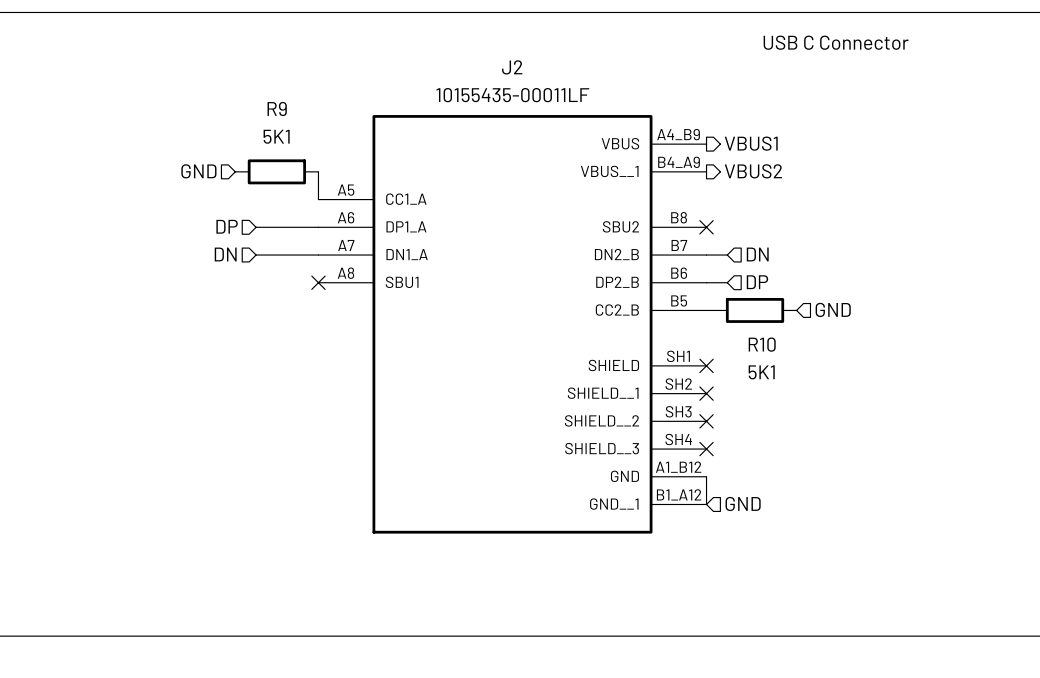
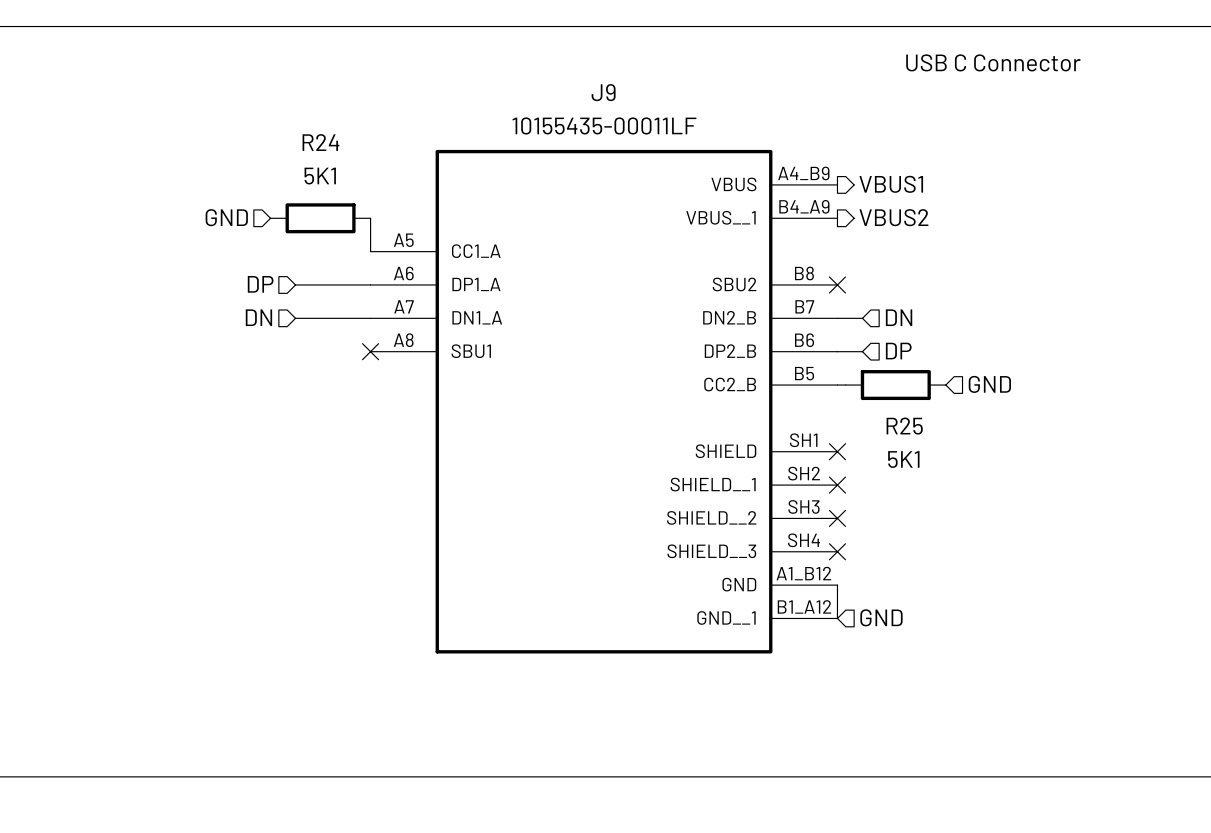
J2 name: J2 (512, 67) -> J9 (603, 92)
R9 name: R9 (277, 108) -> R24 (320, 142)
R10 name: R10 (762, 344) -> R25 (904, 426)

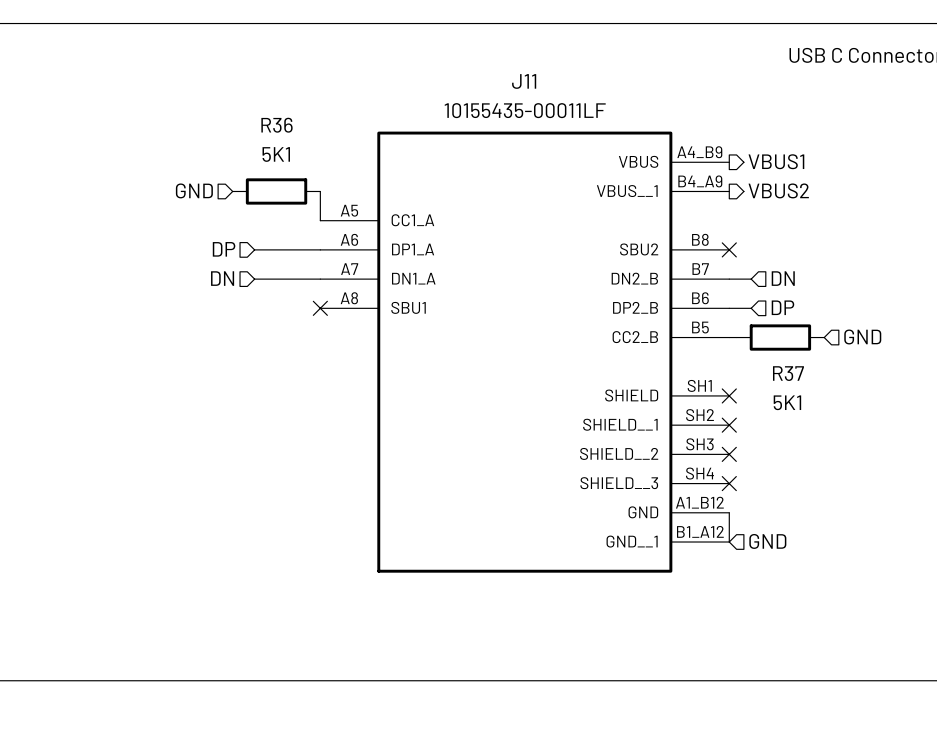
J9 name: J9 (603, 92) -> J11 (524, 81)
R24 name: R24 (320, 142) -> R36 (276, 125)
R25 name: R25 (904, 426) -> R37 (788, 373)

